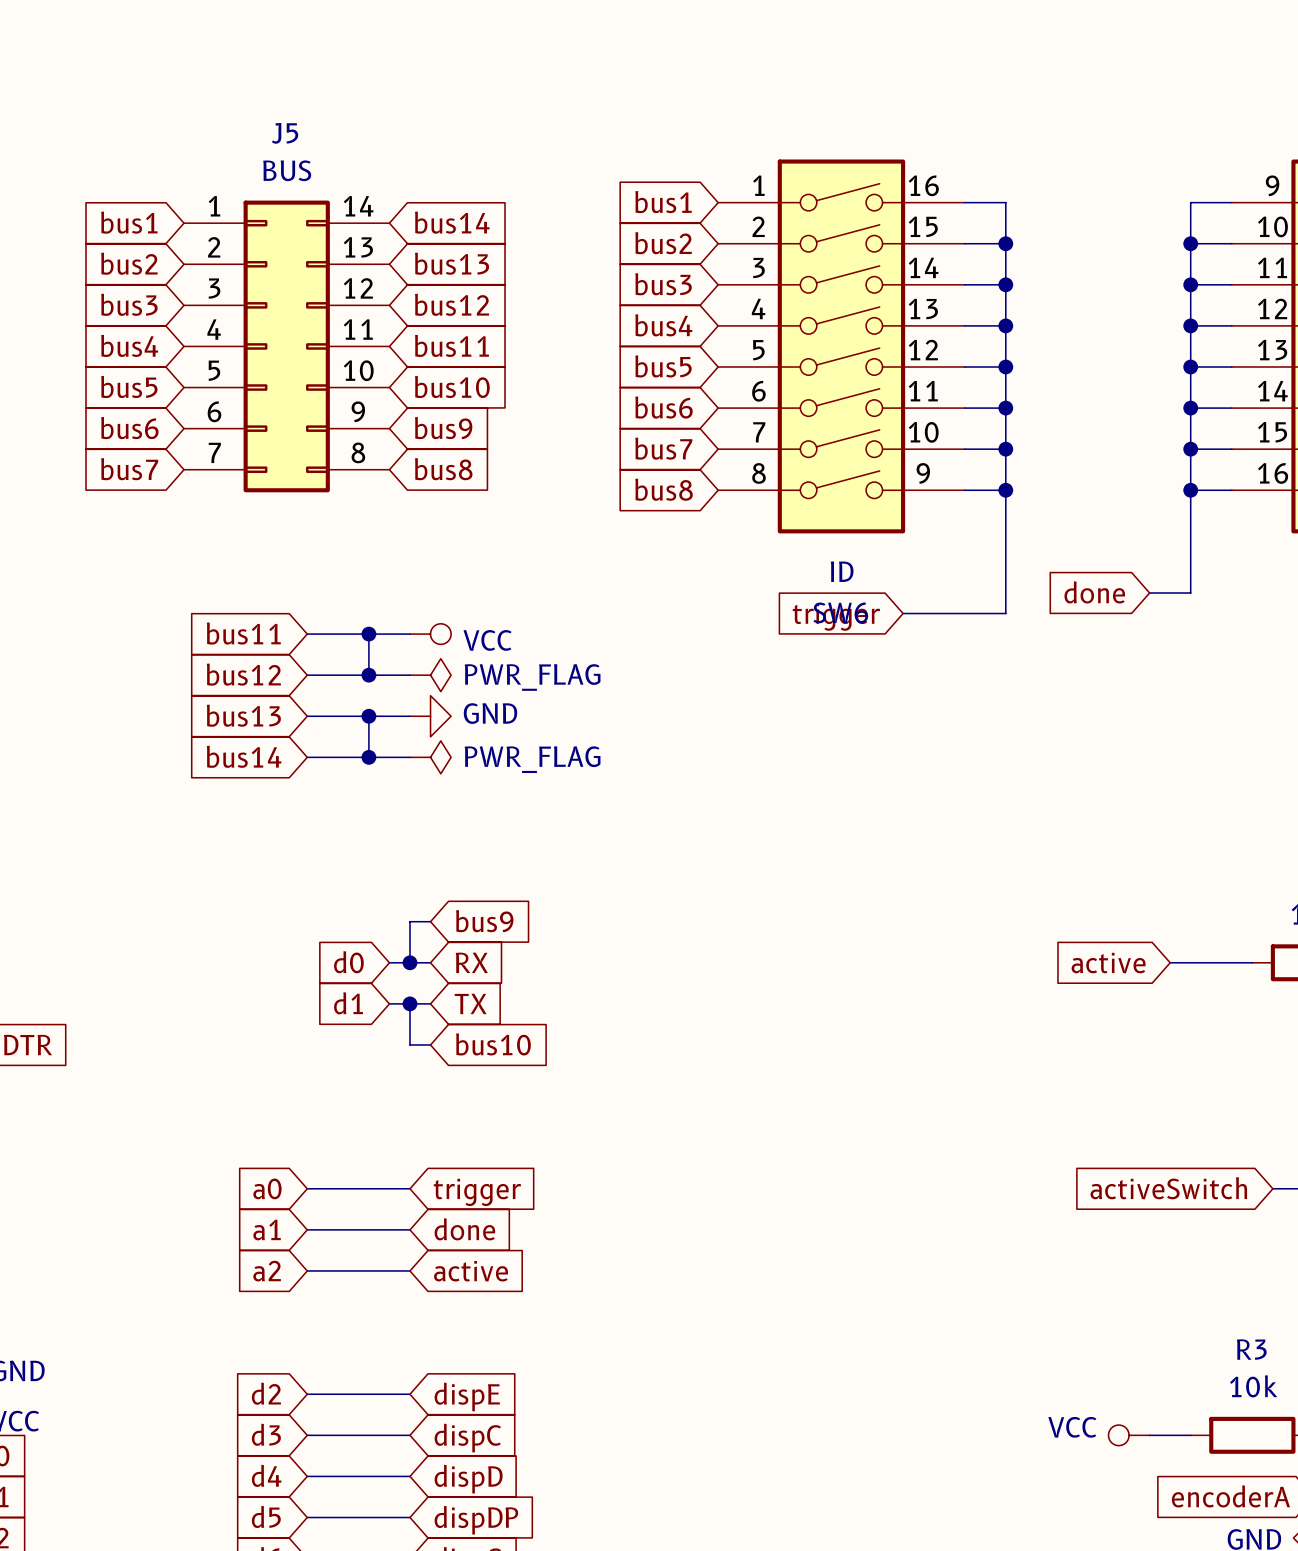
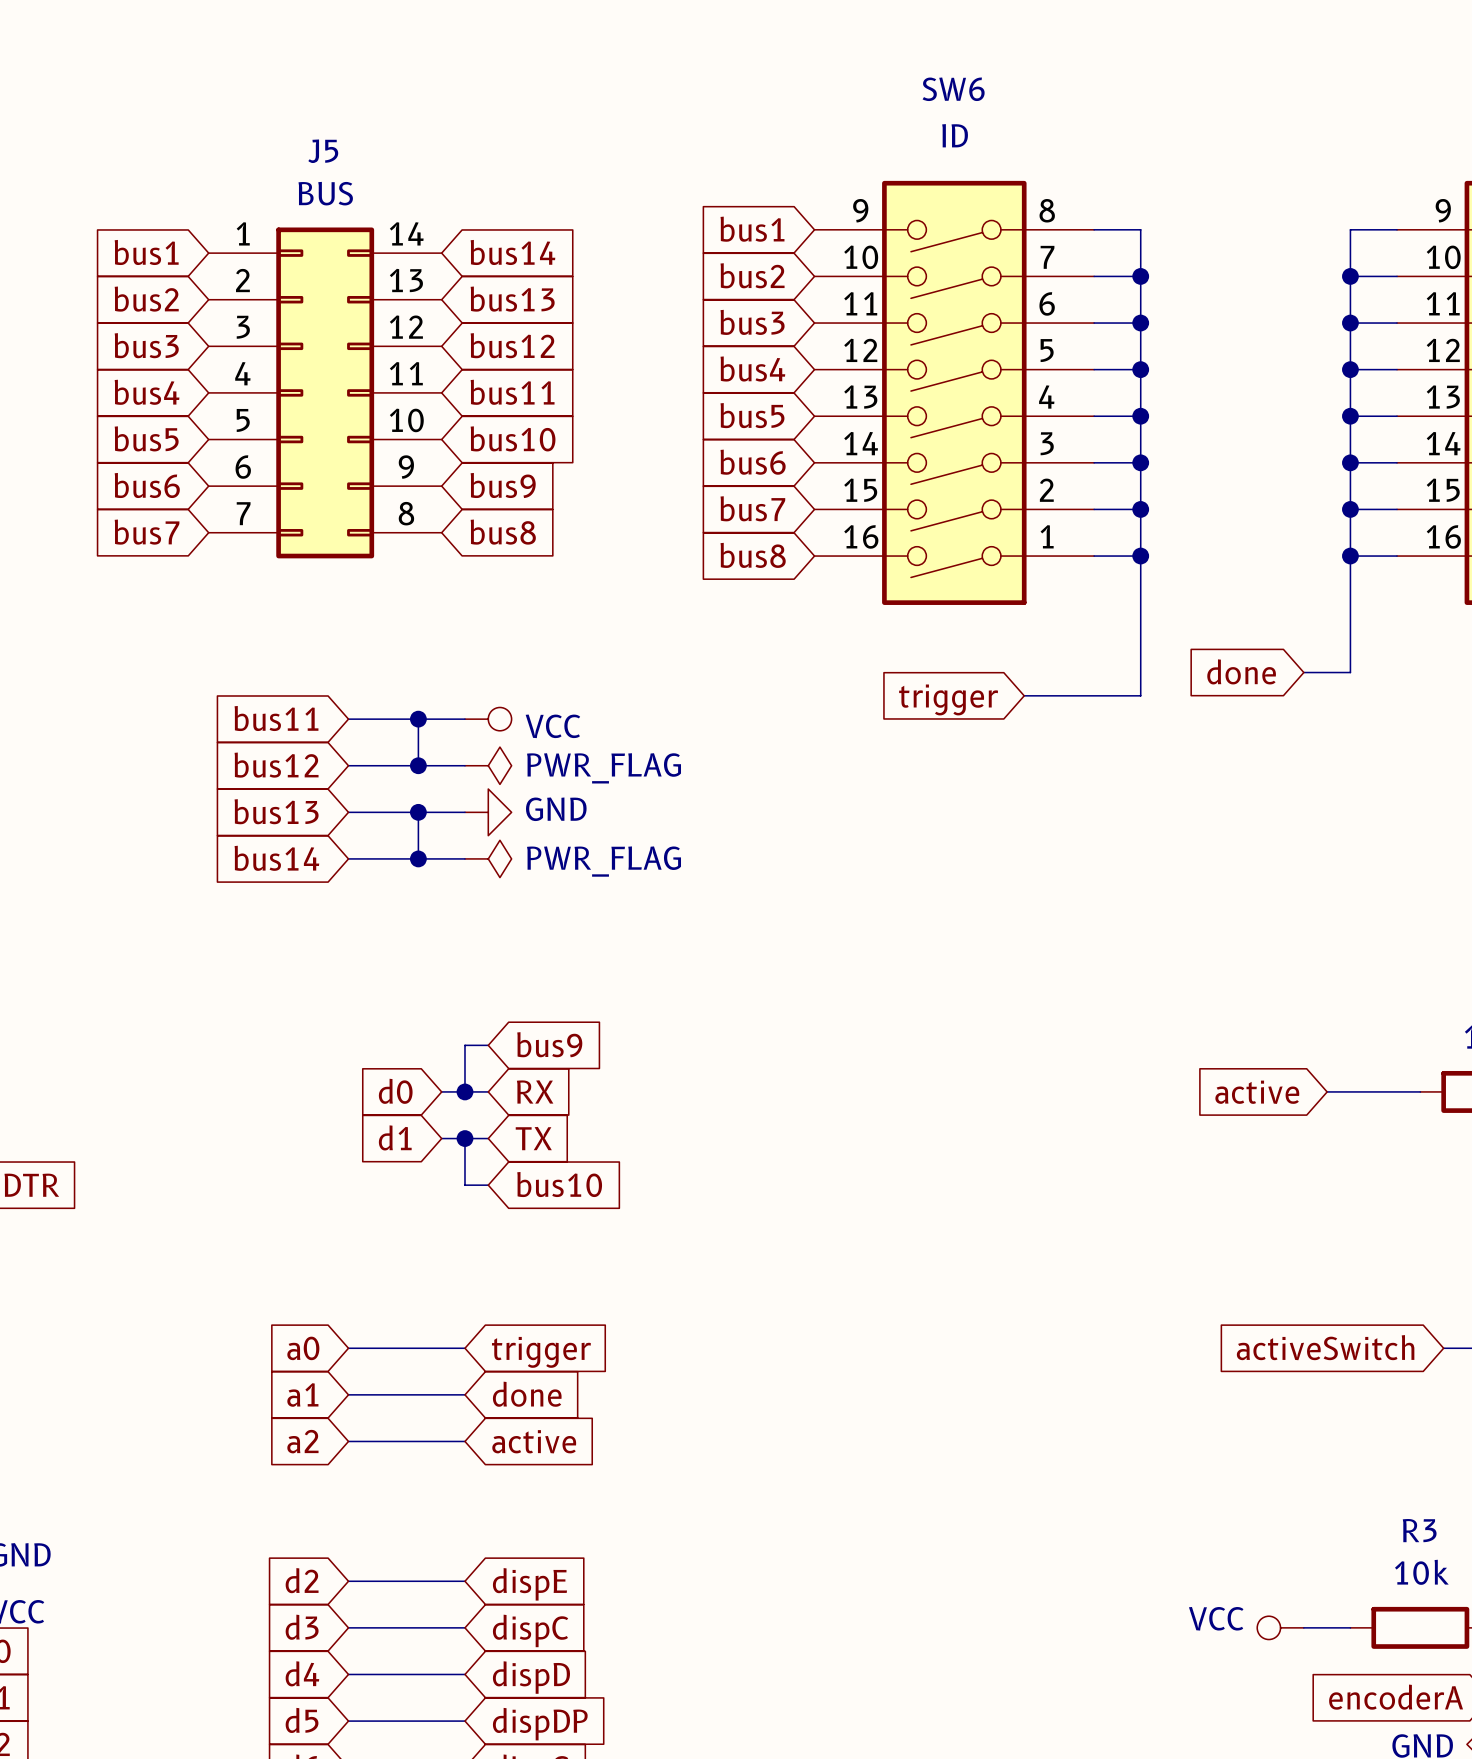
SW6 rotation: 0° (841, 346) -> 180° (954, 392)

